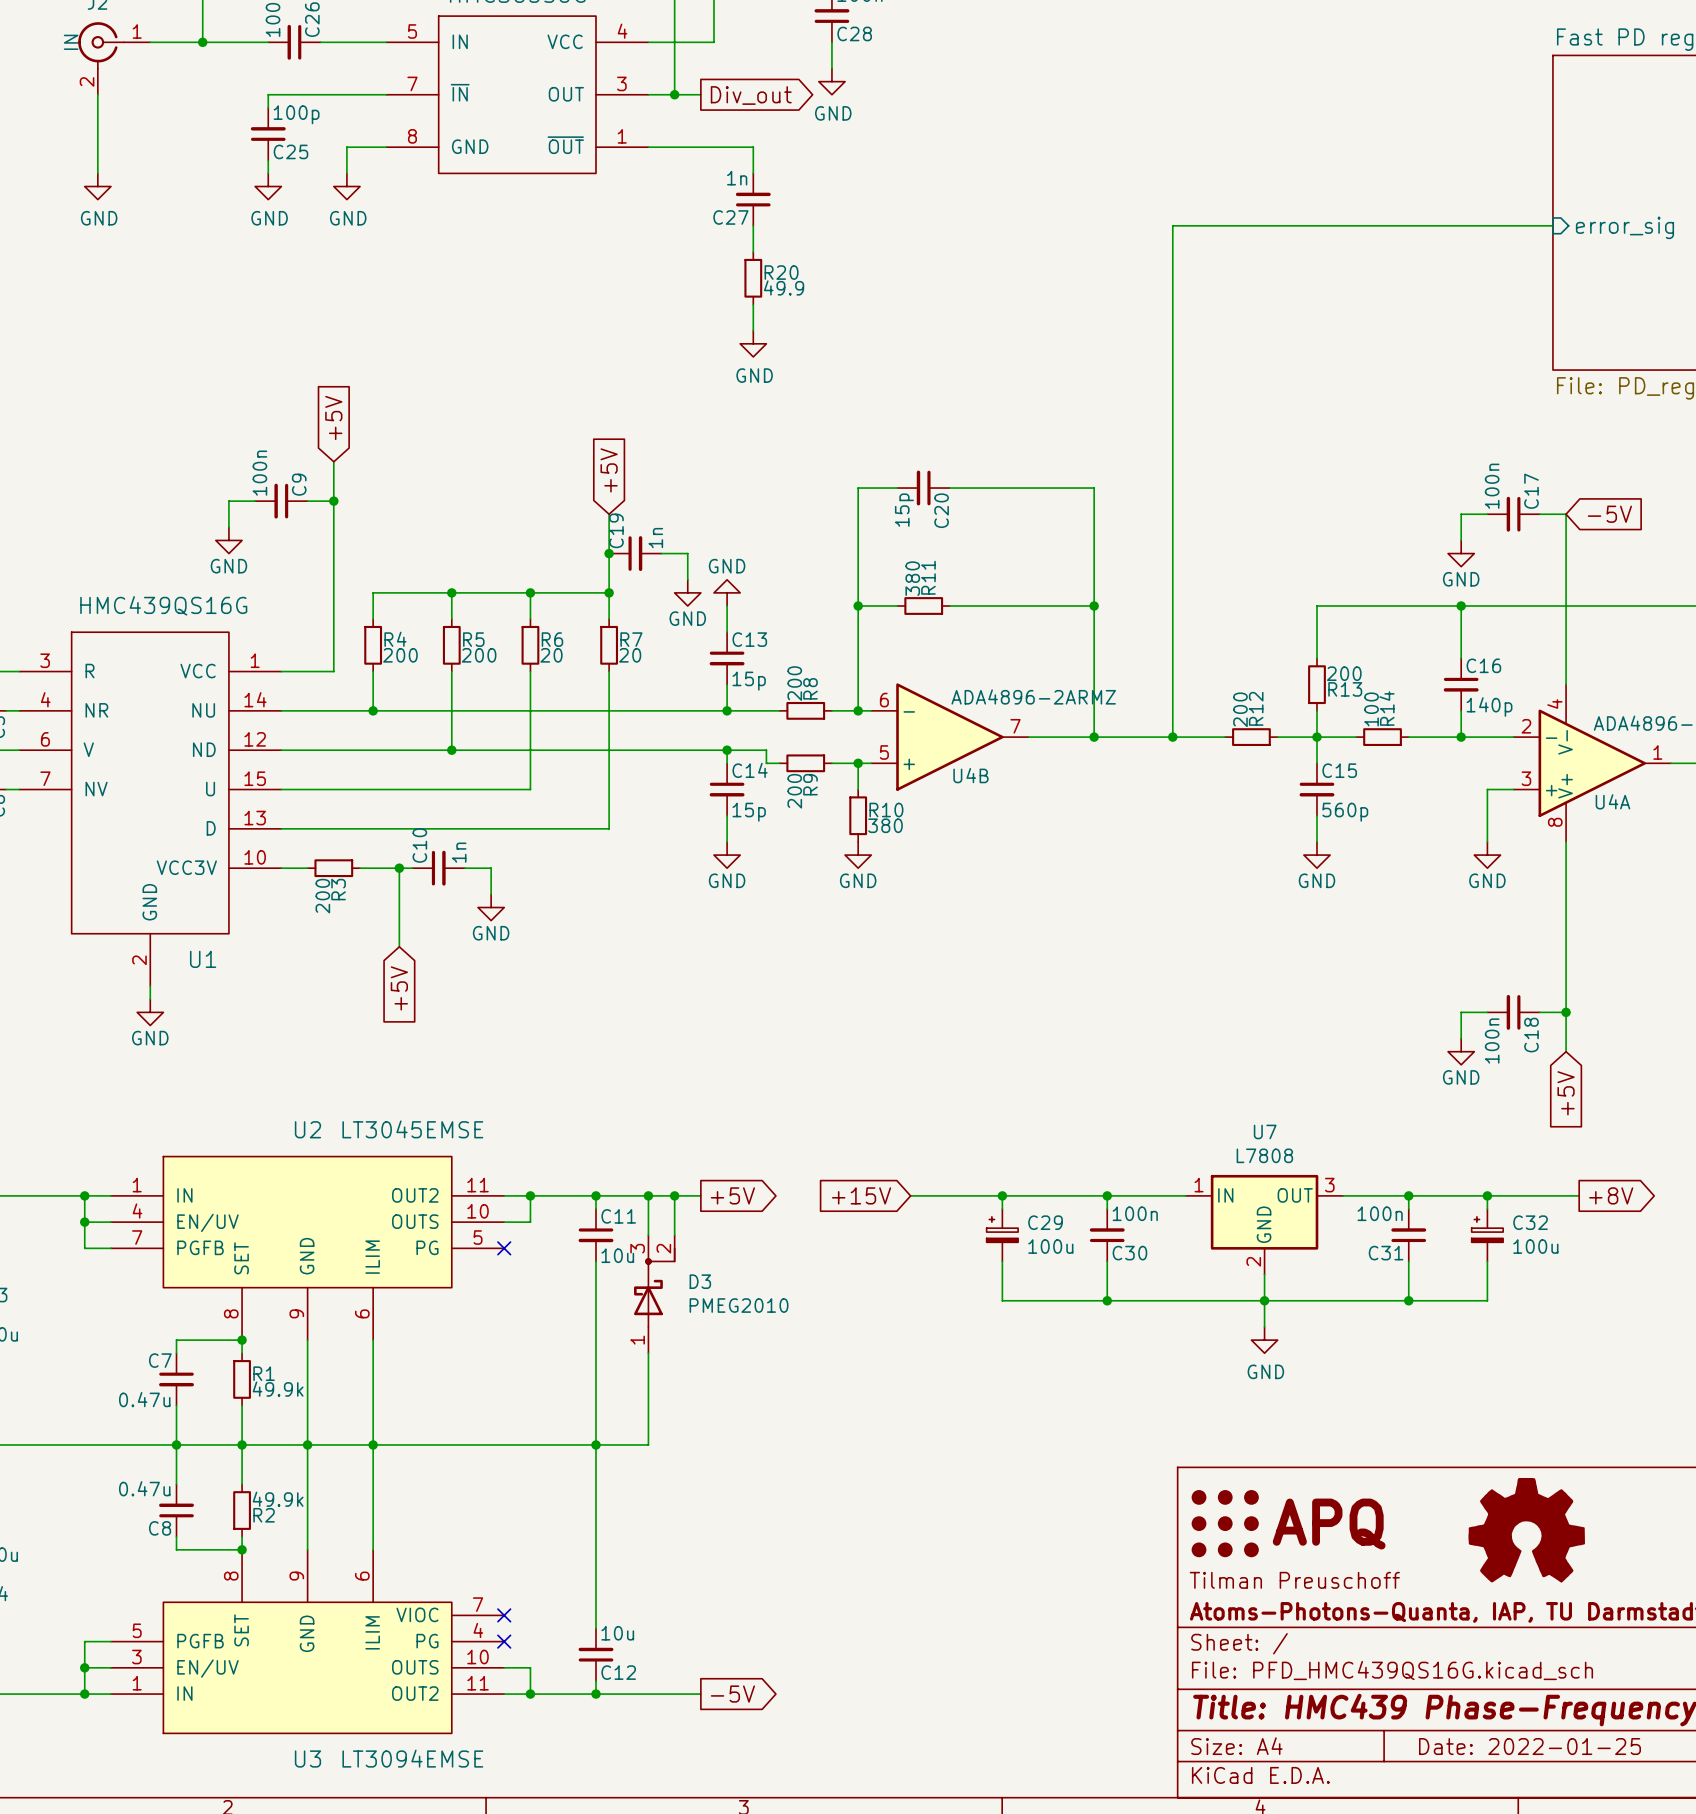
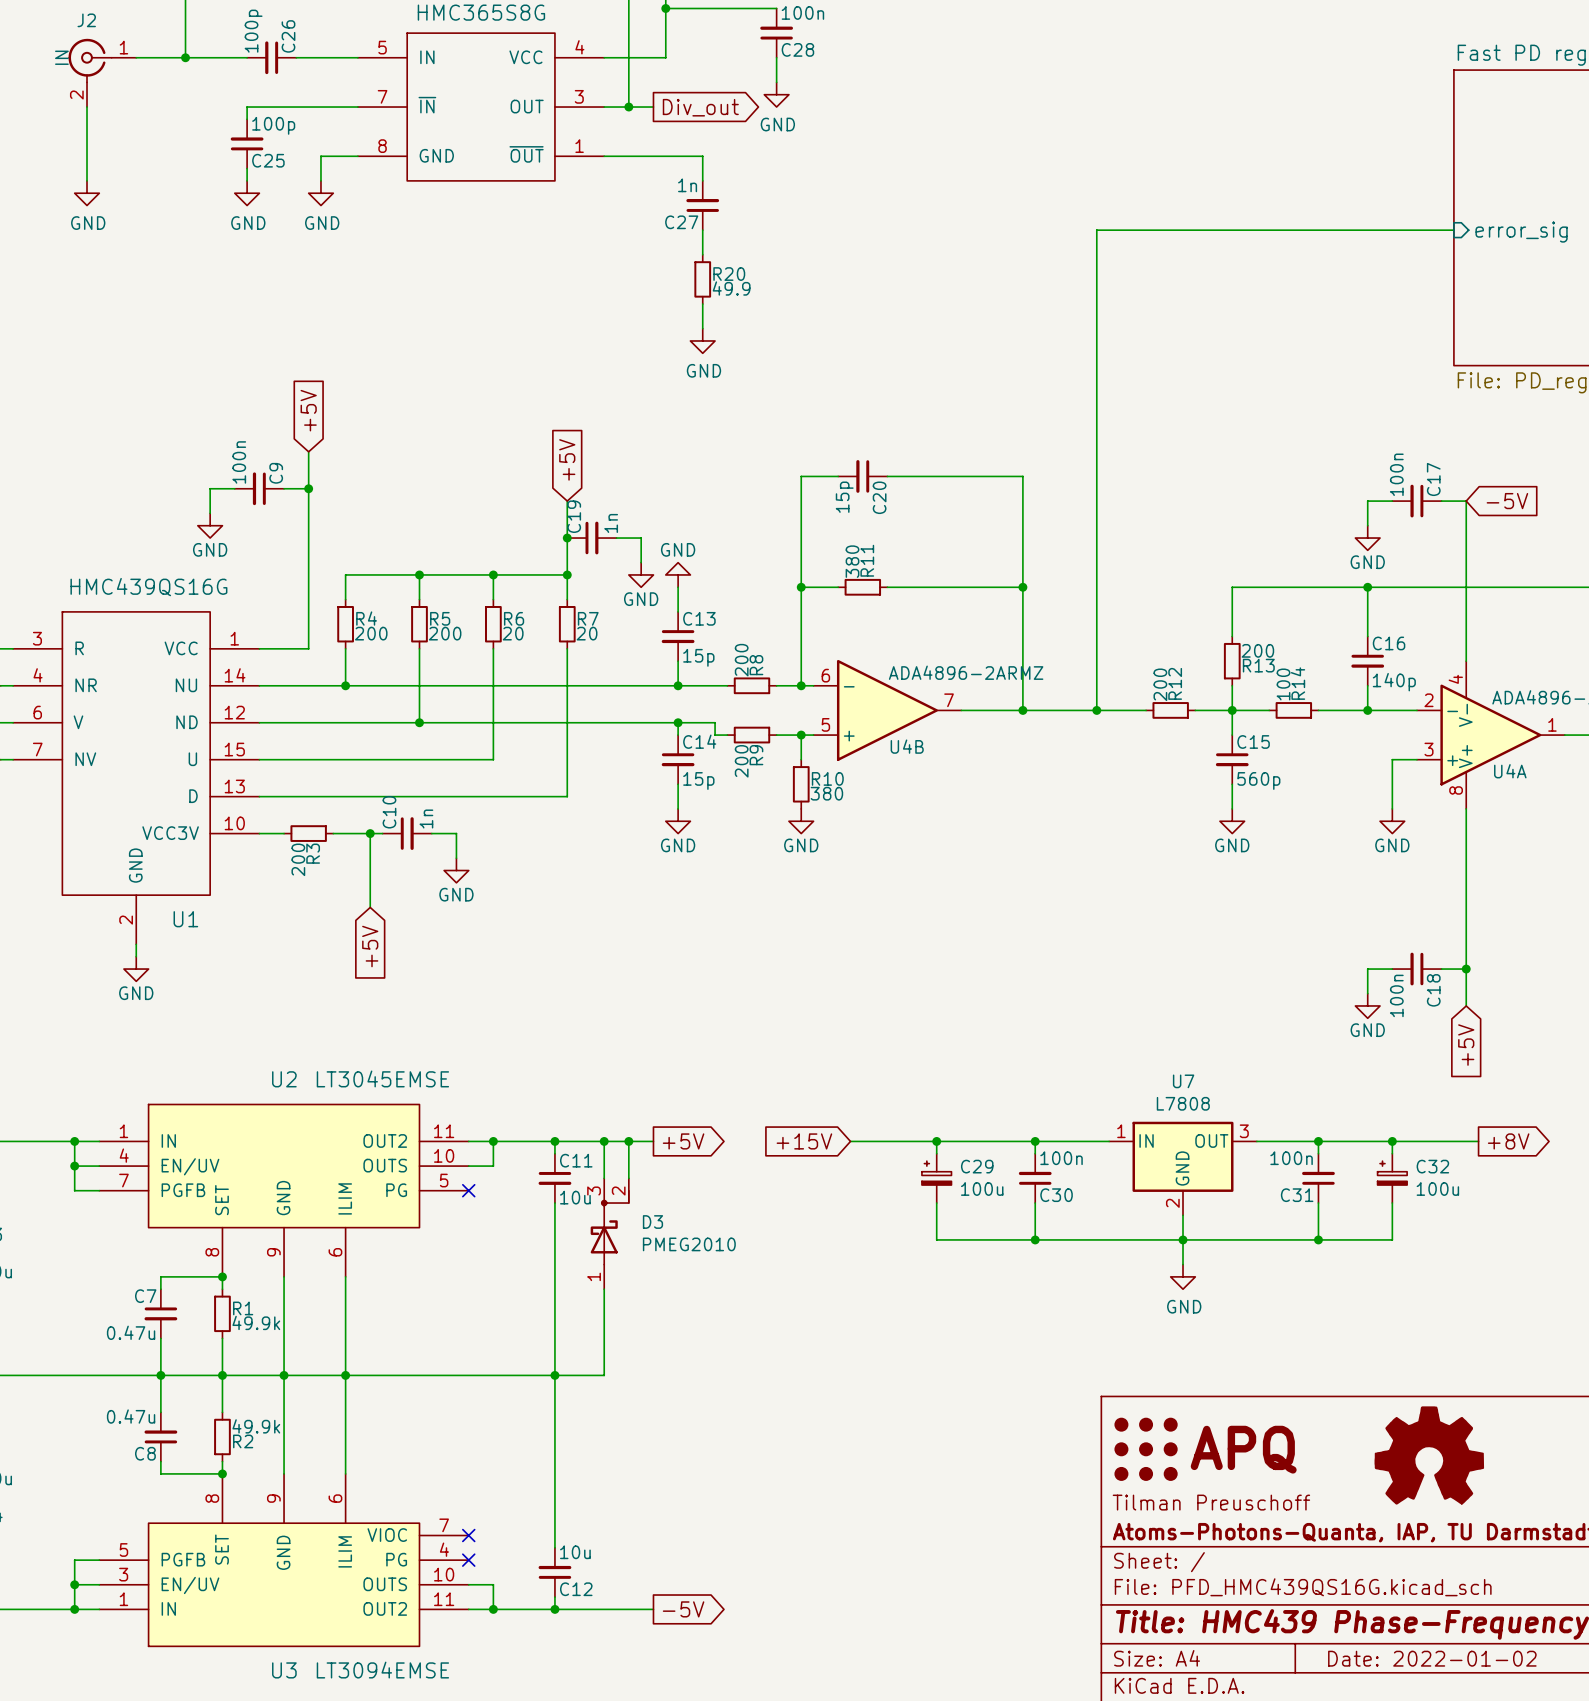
title block: Date: 2022-01-25 (1530, 1746) -> Date: 2022-01-02 (1432, 1658)

